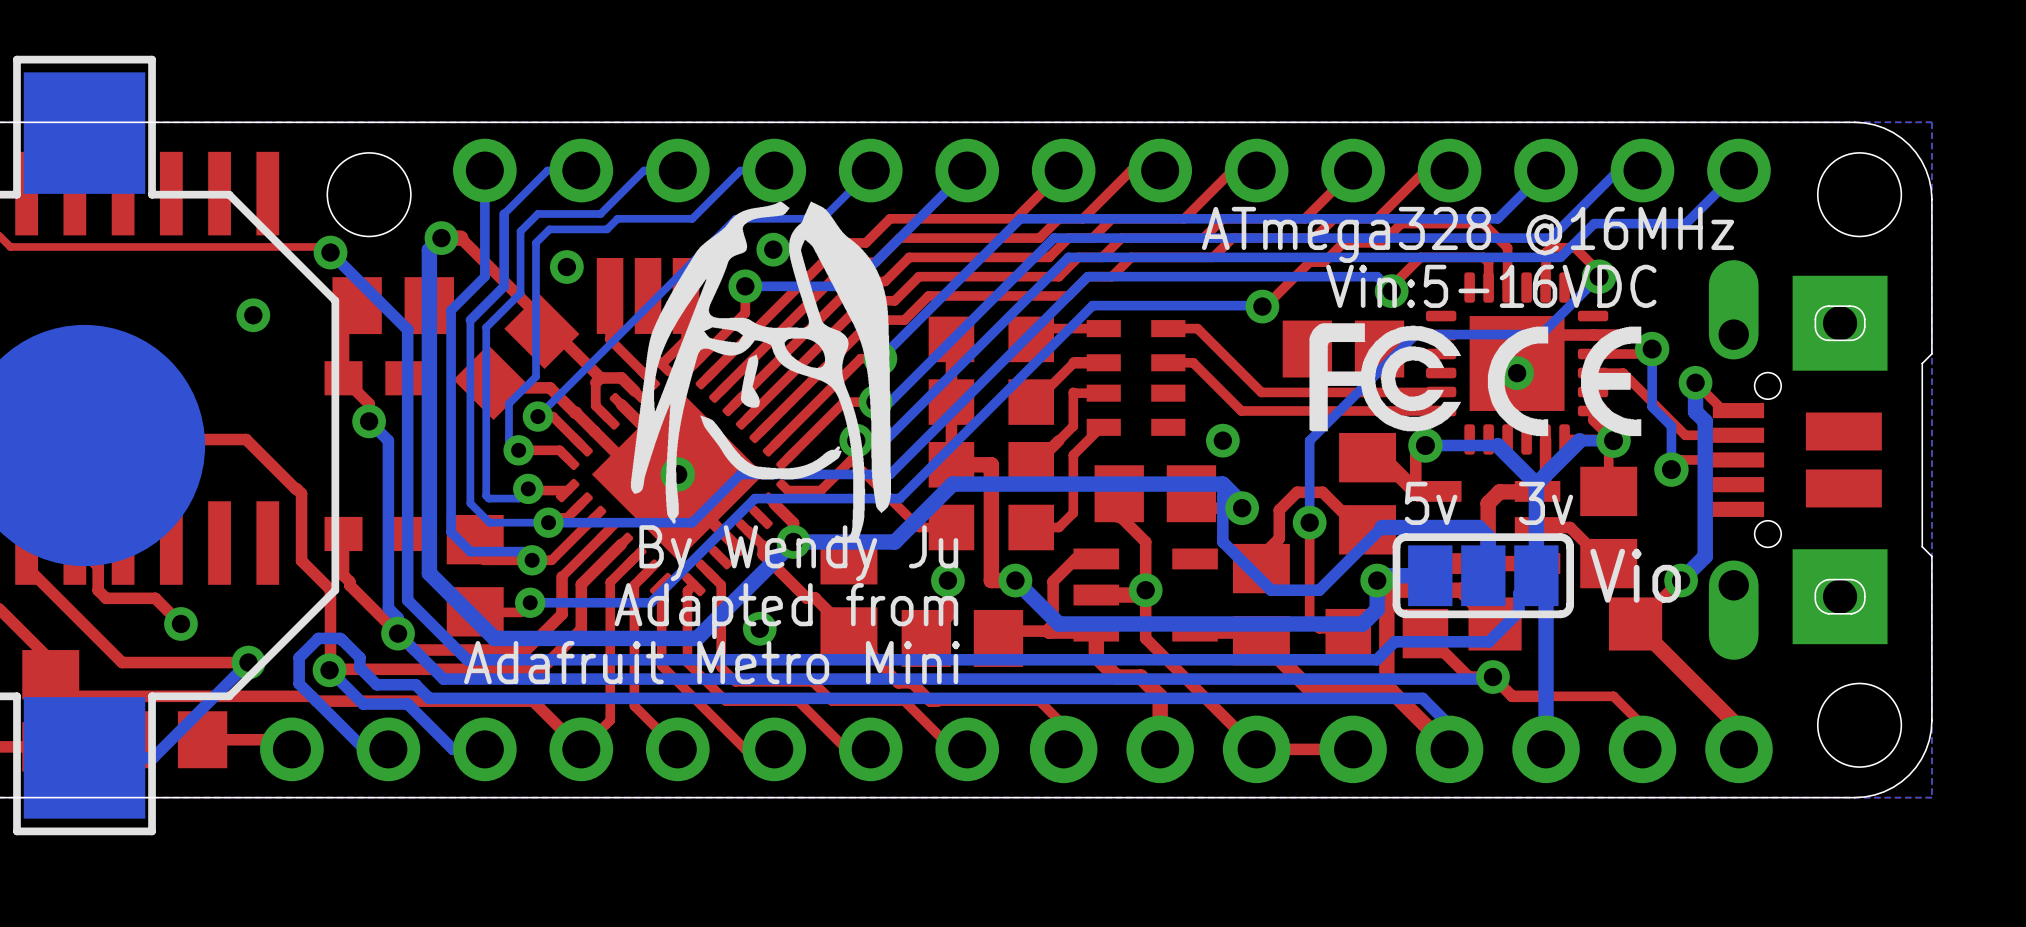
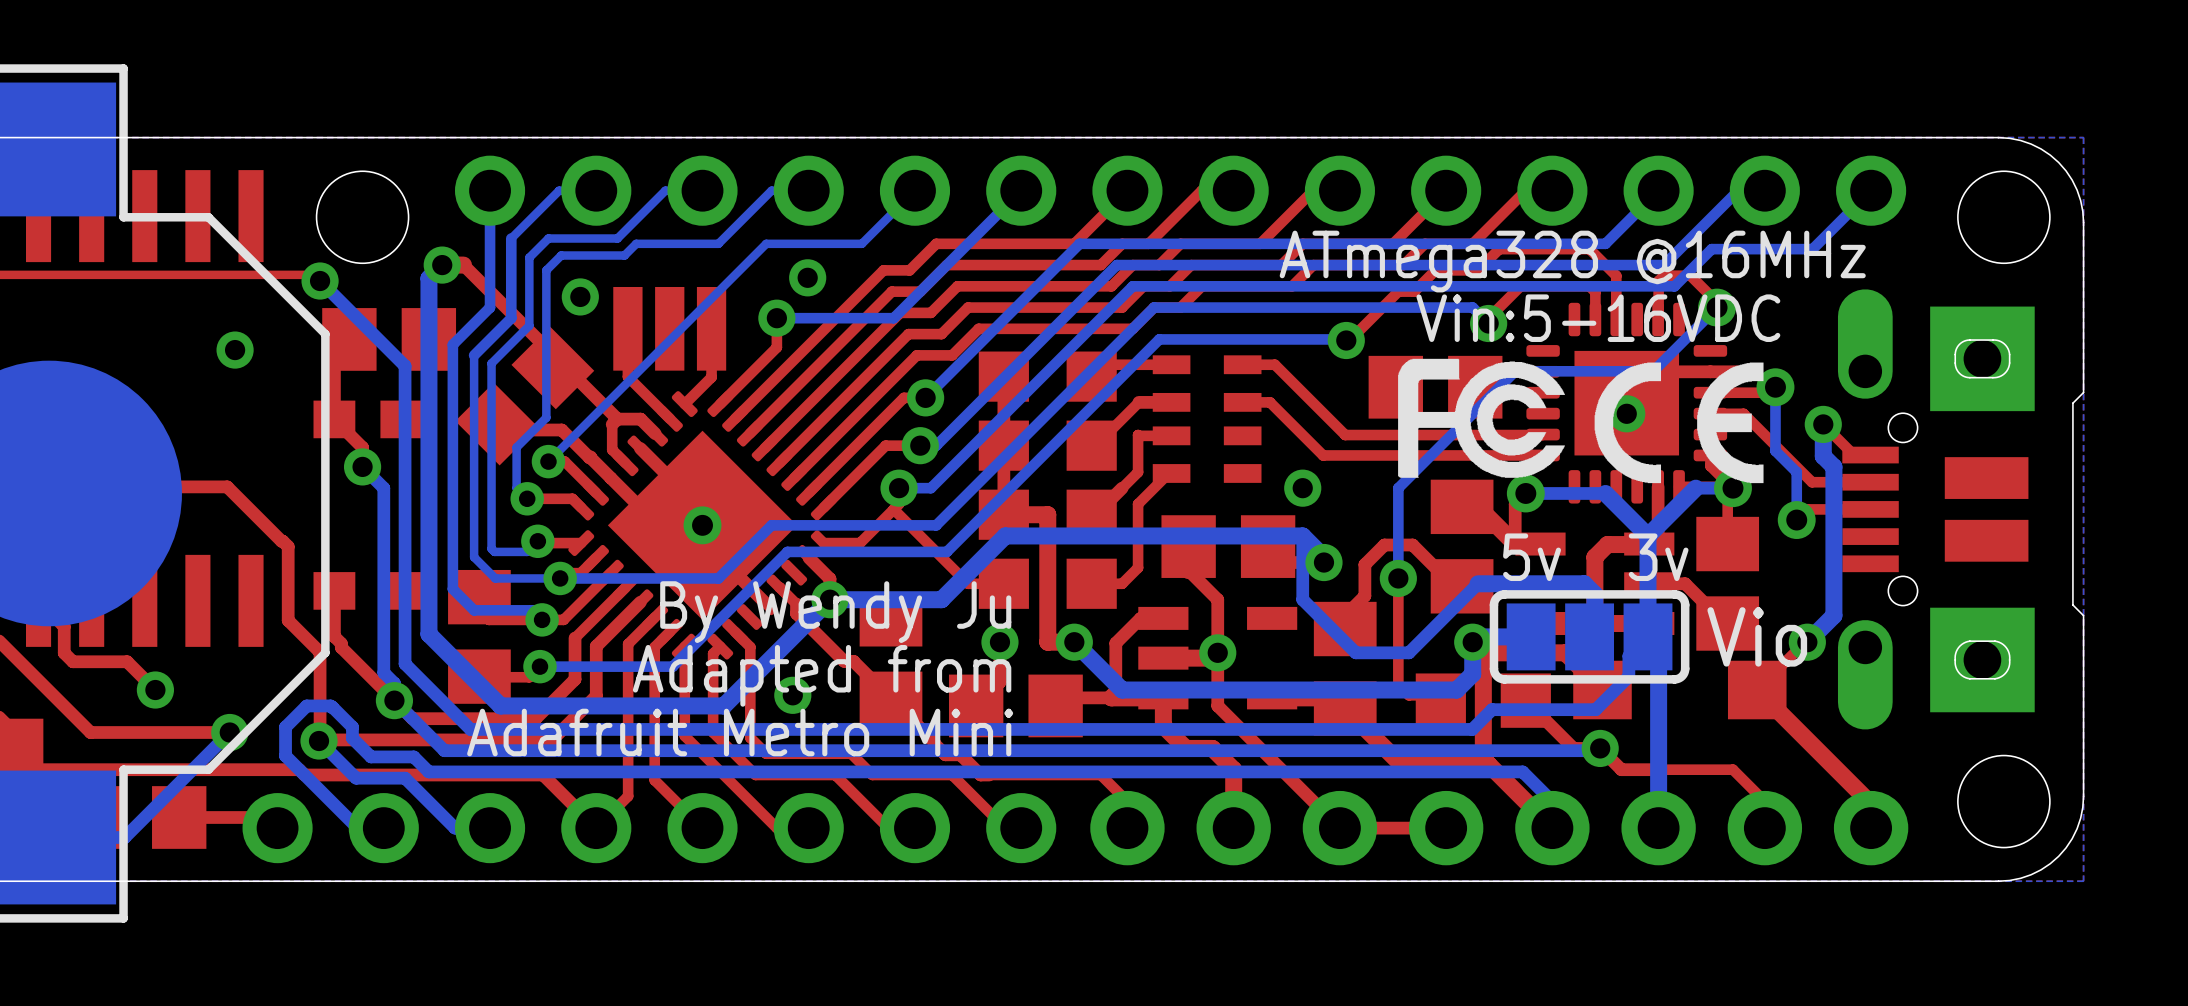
drawing: [630, 201, 892, 543] -> none

